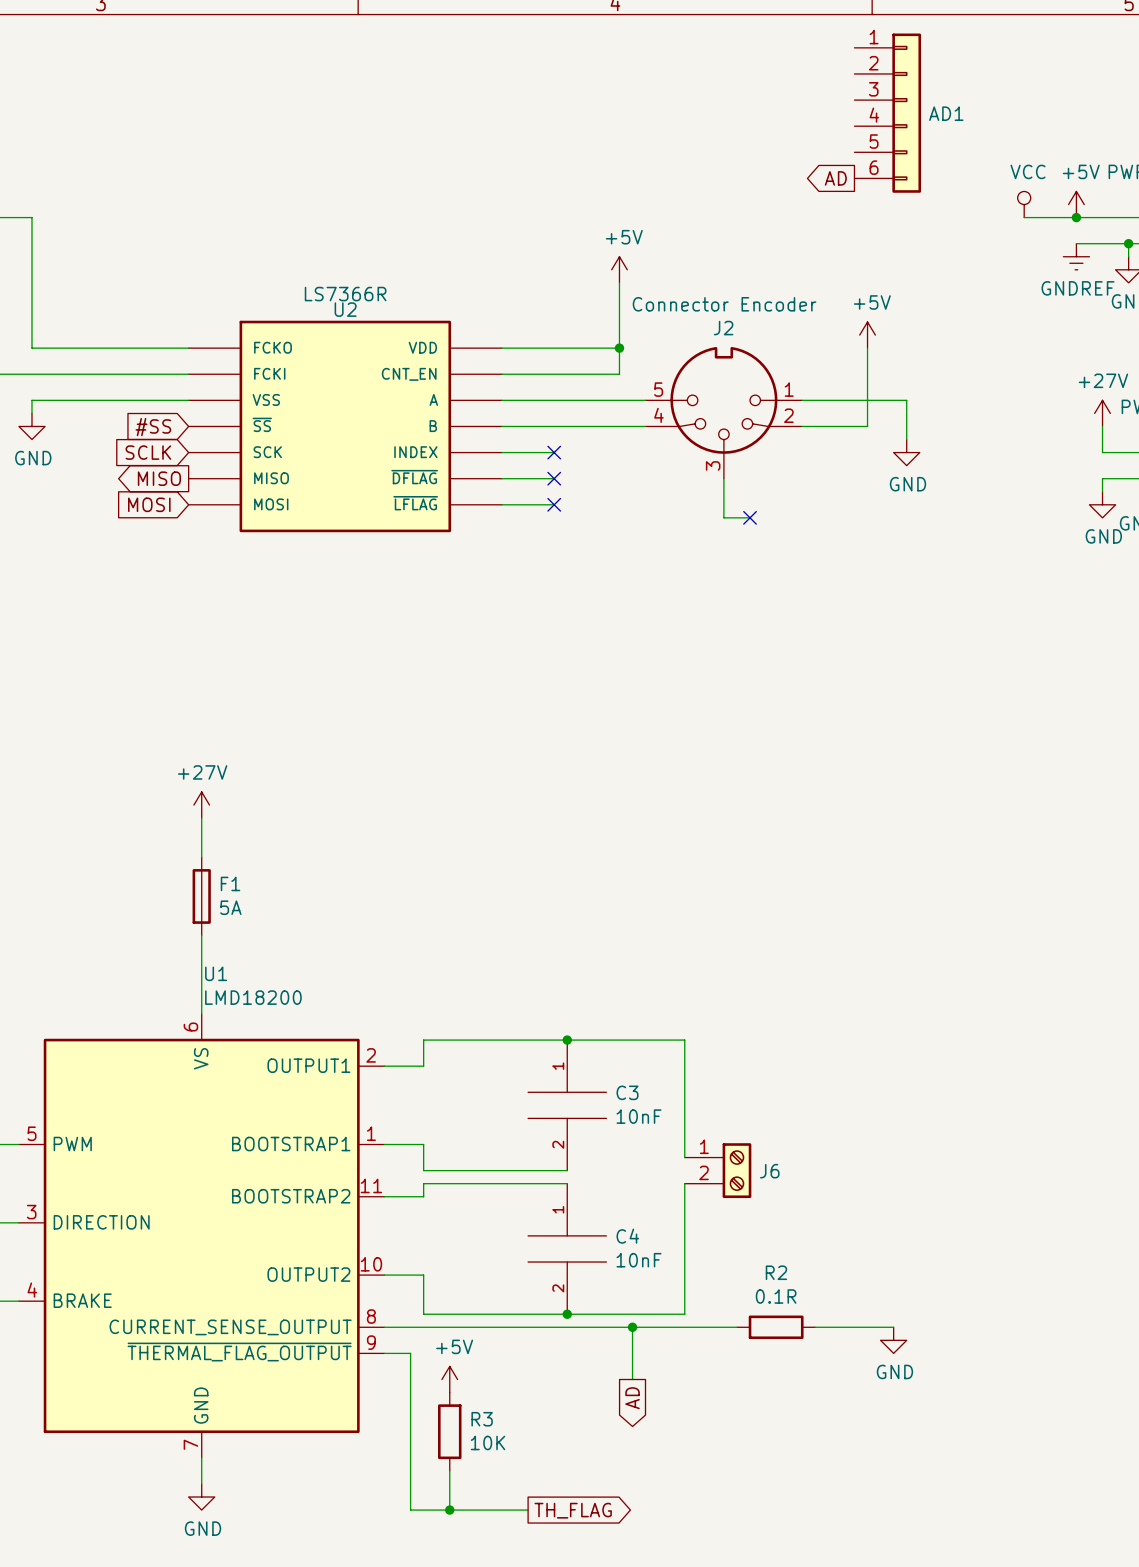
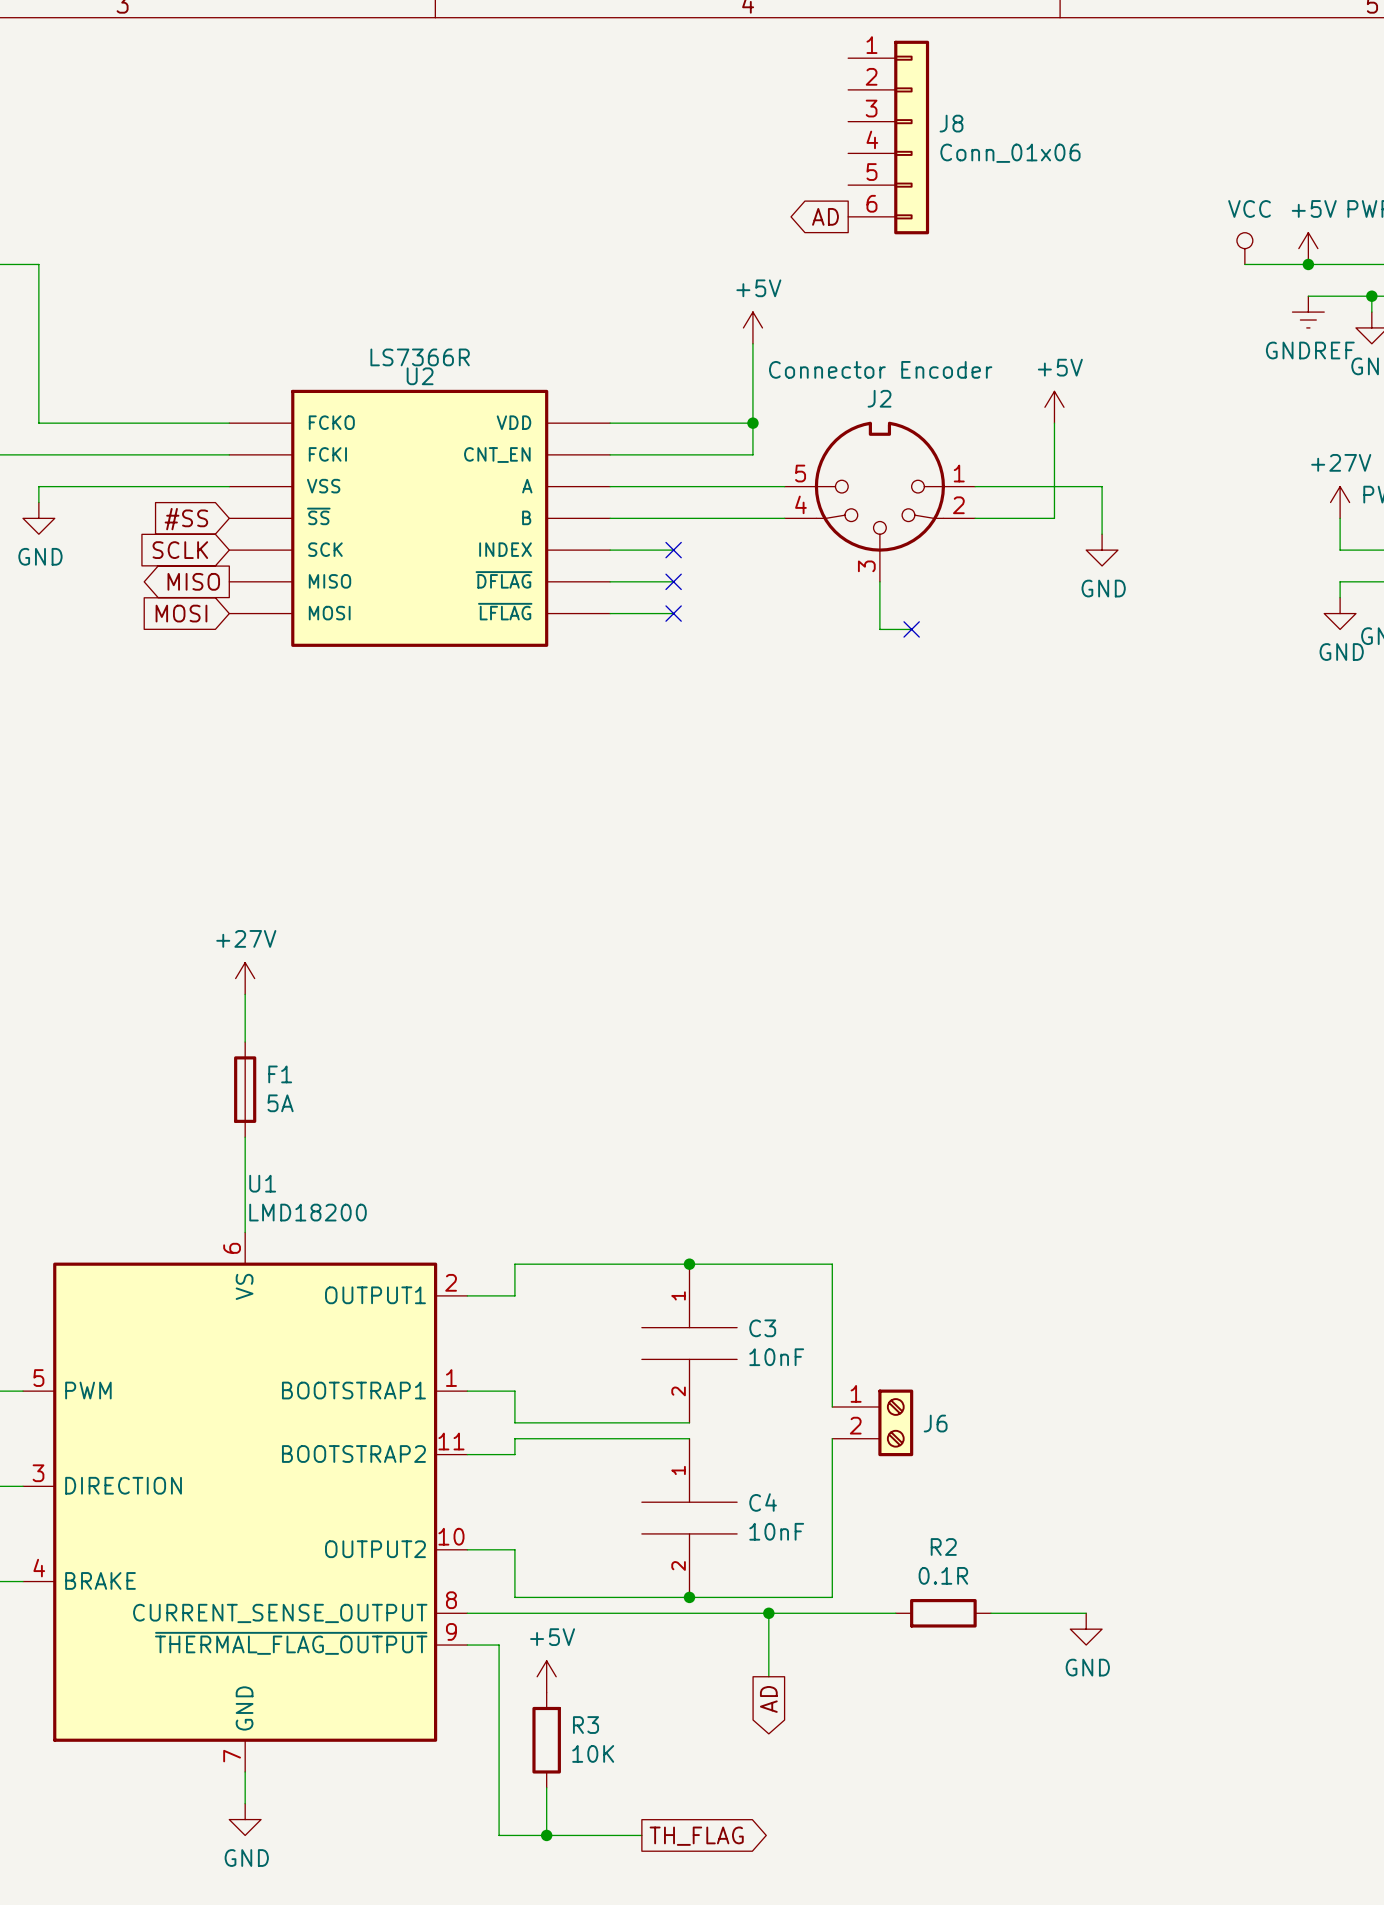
J8: none -> Conn_01x06 (888, 137)
AD1: (887, 113) -> none
global label position: AD (835, 178) -> AD (825, 216)

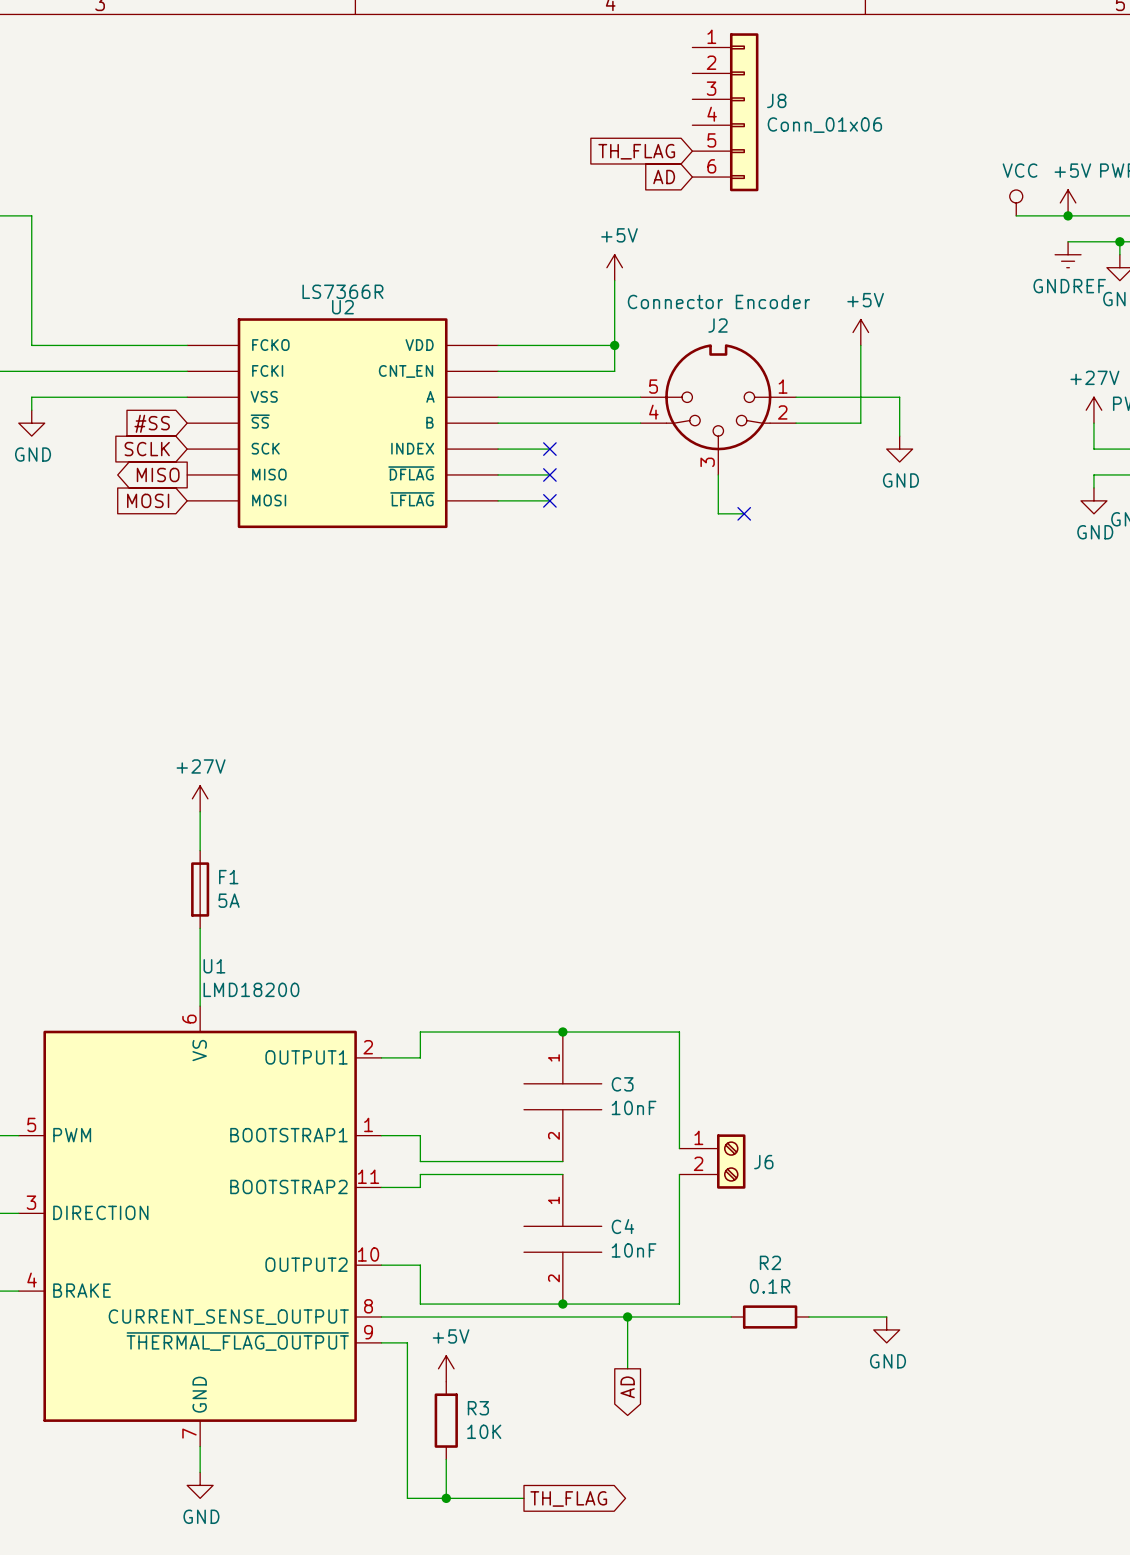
global label: none -> TH_FLAG (636, 151)
global label shape: output (825, 216) -> input (664, 177)

